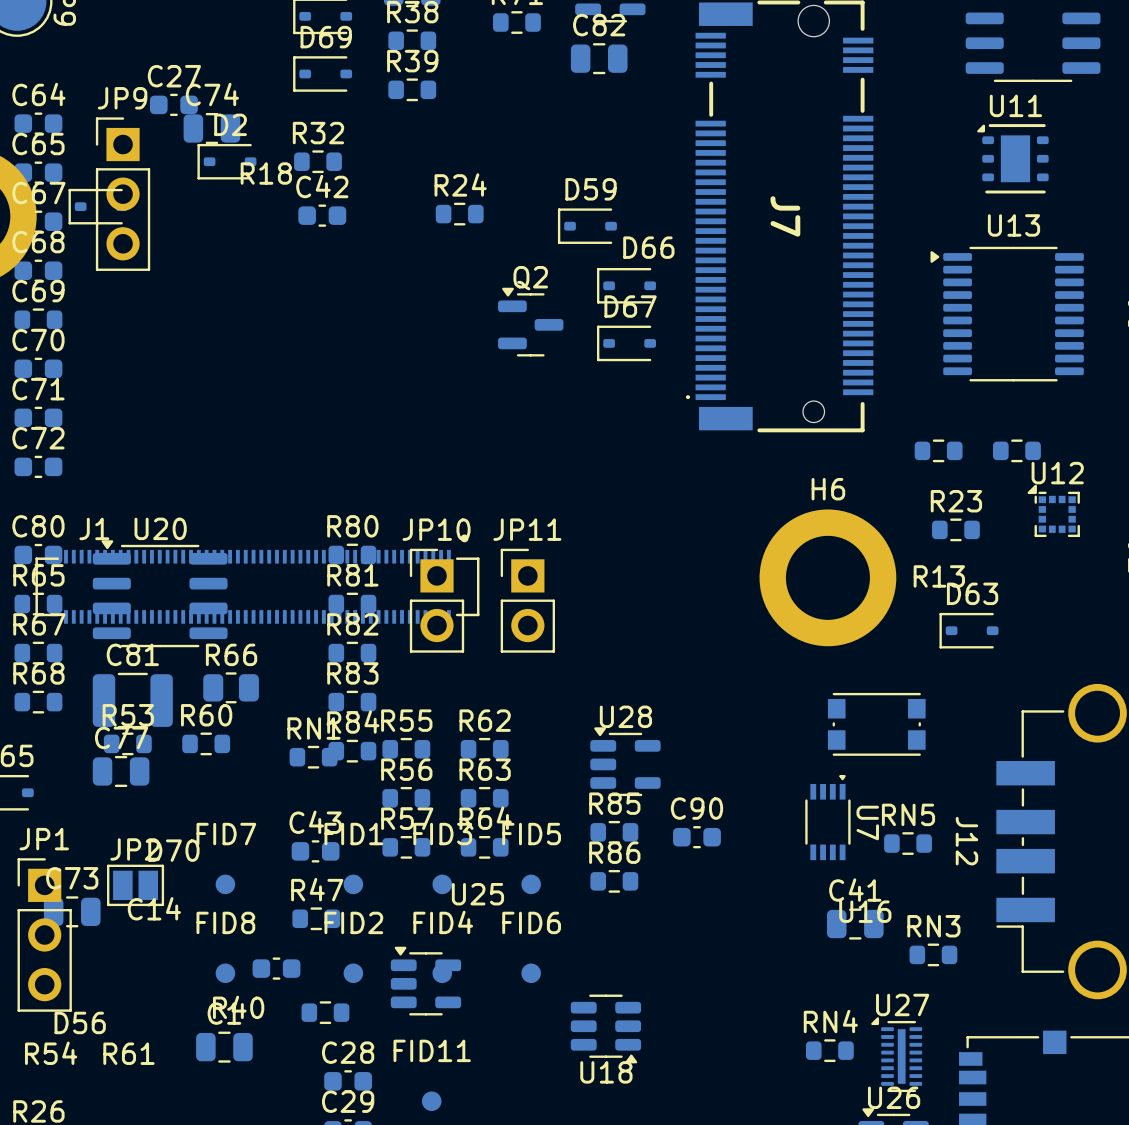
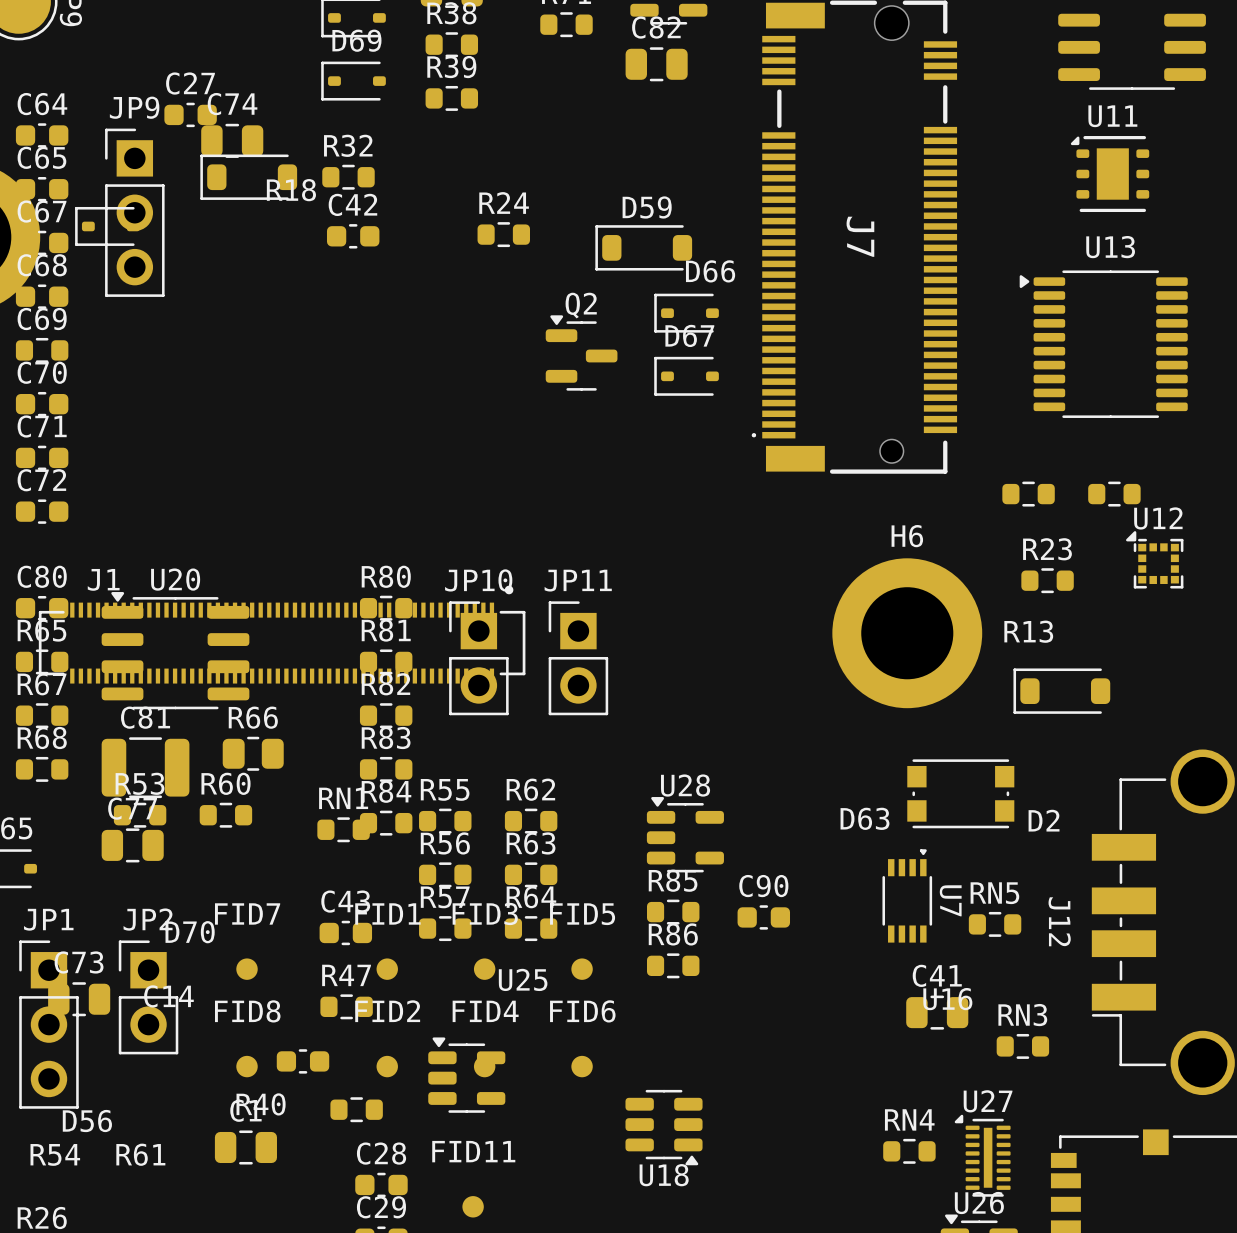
D2 name position: D2 (230, 124) -> D2 (1044, 820)
D2 footprint: [197, 143, 257, 180] -> [200, 154, 298, 200]
D59 footprint: [557, 208, 617, 244] -> [595, 225, 693, 271]
D63 name position: D63 (972, 593) -> D63 (864, 818)
D63 footprint: [939, 612, 999, 649] -> [1013, 668, 1111, 714]
JP2 footprint: [107, 864, 165, 907] -> [118, 940, 179, 1055]

